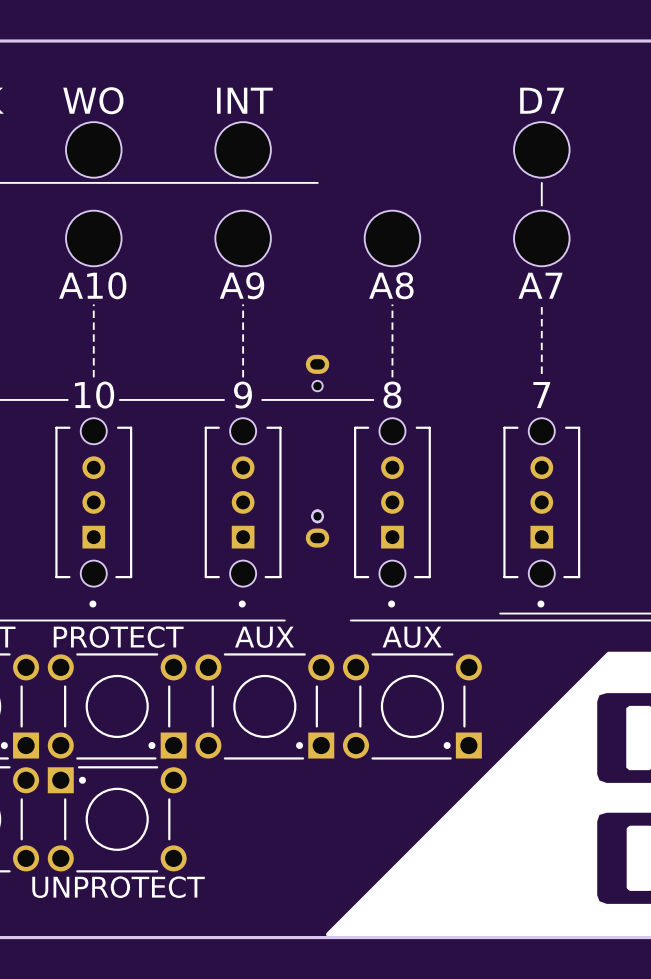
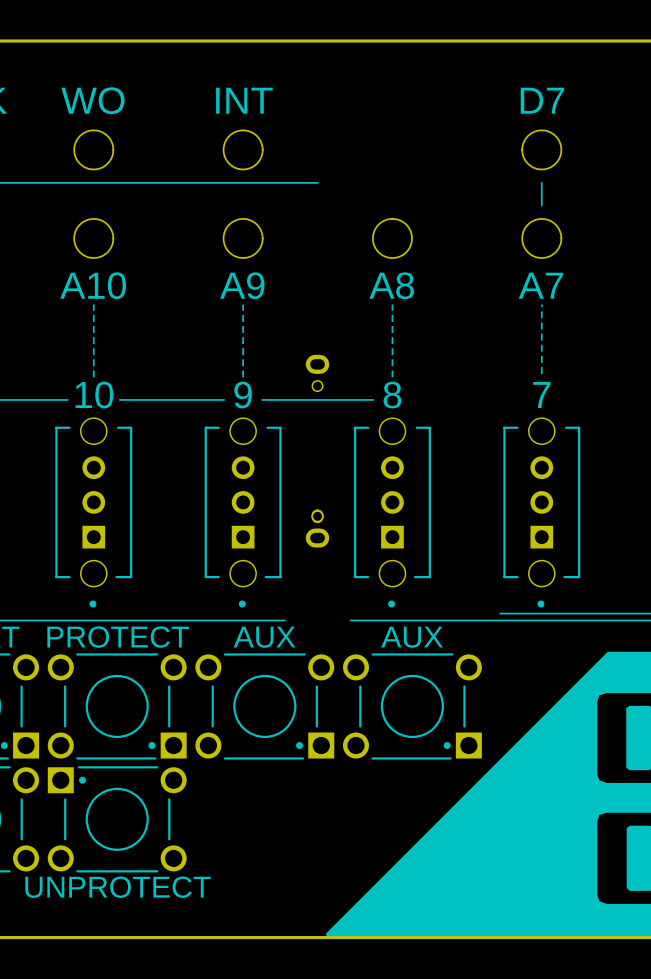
part footprint: [66, 122, 122, 178] -> [73, 129, 115, 171]
part footprint: [215, 122, 271, 178] -> [222, 129, 264, 171]
part footprint: [514, 122, 570, 178] -> [521, 129, 563, 171]
part footprint: [66, 210, 122, 267] -> [73, 218, 115, 259]
part footprint: [215, 210, 271, 267] -> [222, 218, 264, 259]
part footprint: [364, 210, 421, 267] -> [372, 218, 413, 259]
part footprint: [514, 210, 570, 267] -> [521, 218, 563, 259]

